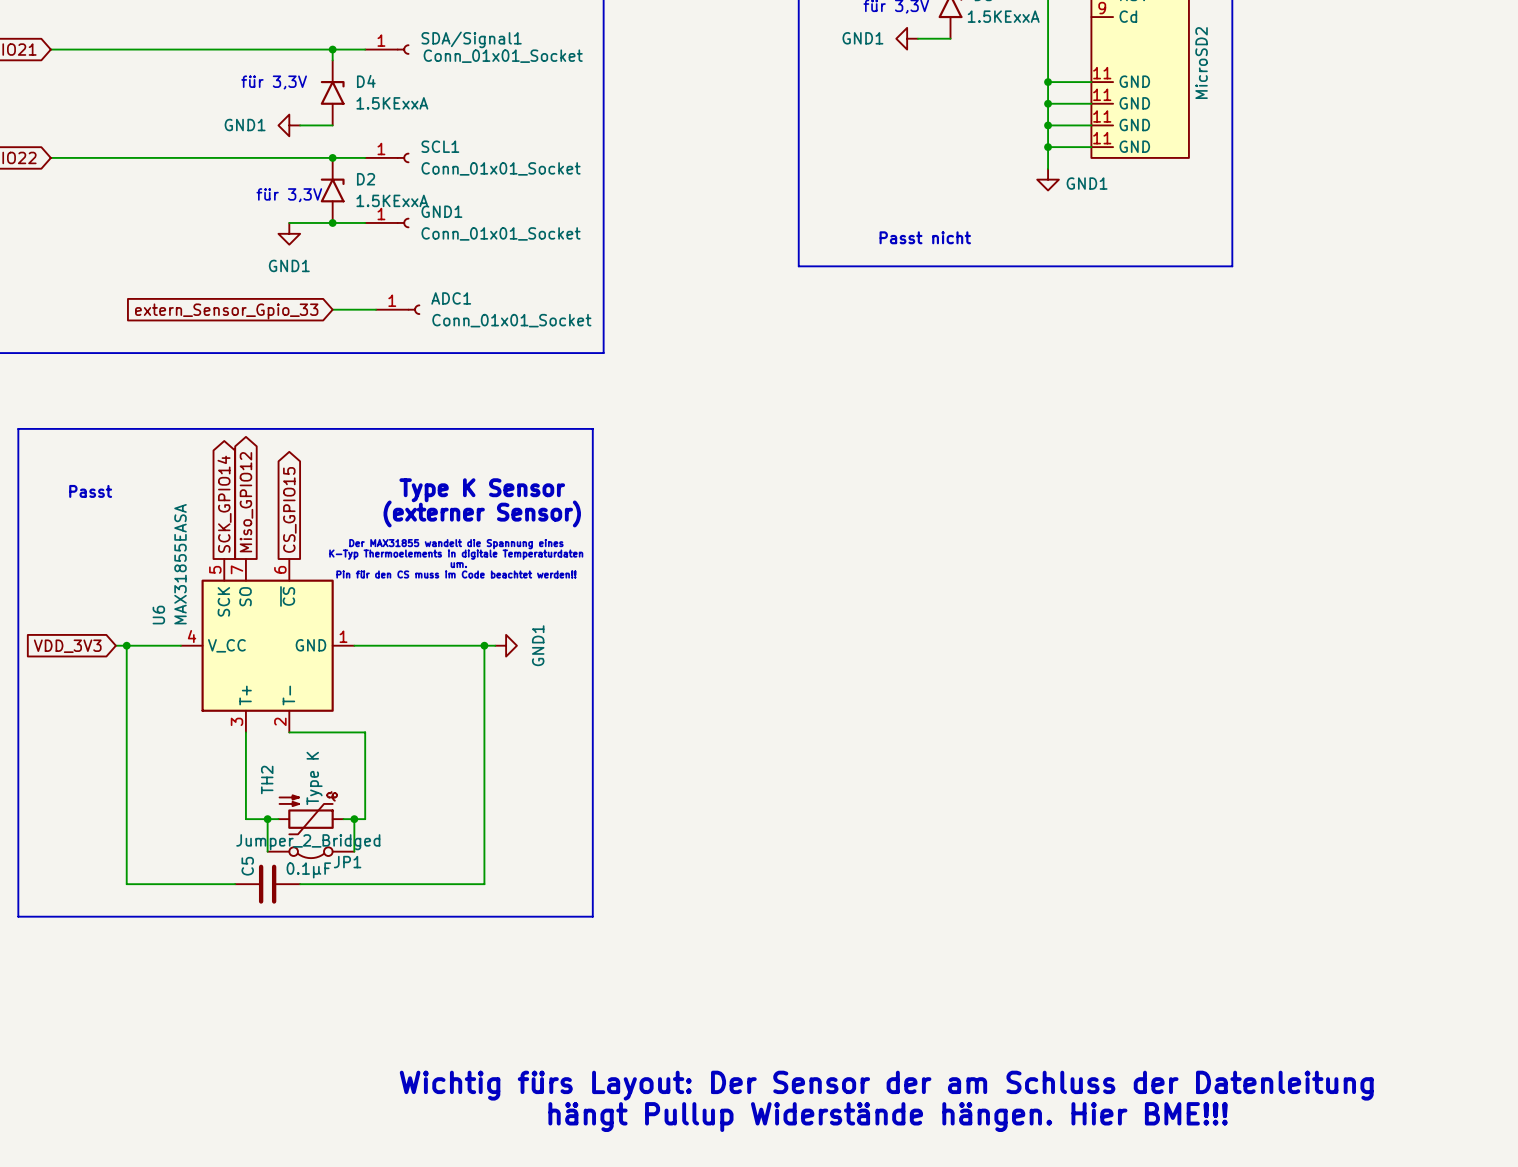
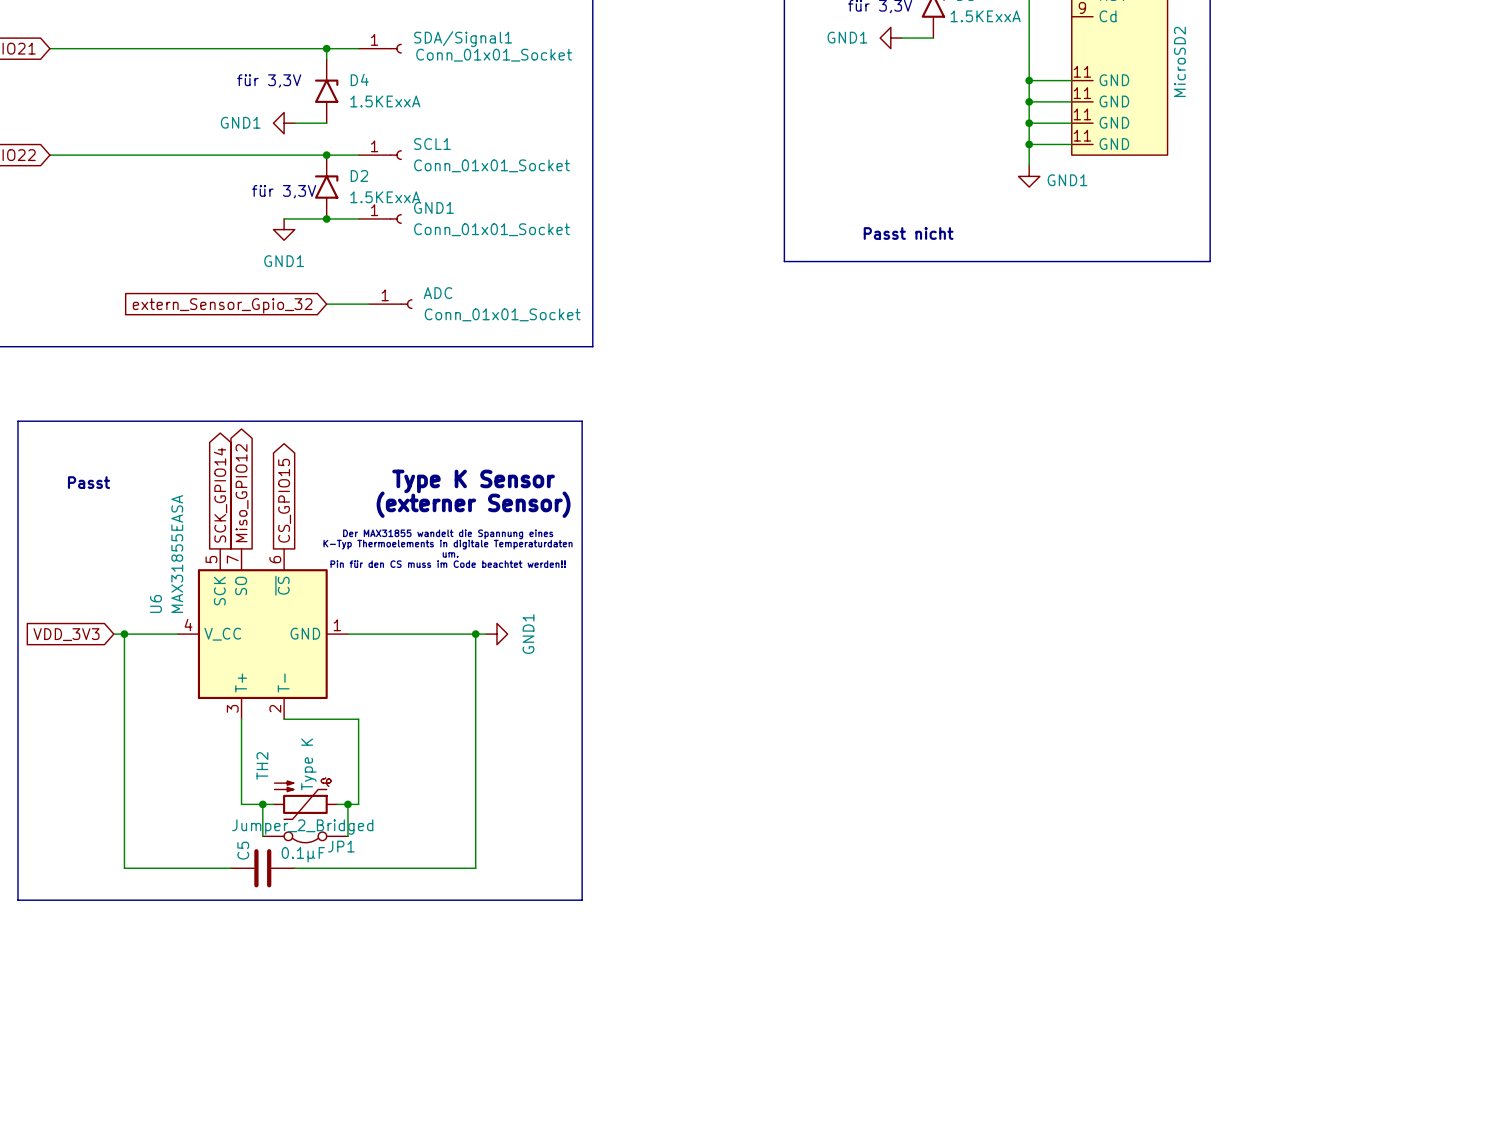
ADC1 name: ADC1 (451, 298) -> ADC (438, 293)
global label: extern_Sensor_Gpio_33 (226, 311) -> extern_Sensor_Gpio_32 (222, 305)
text: Wichtig fürs Layout: Der Sensor der am Schluss der Datenleitung (886, 1085) -> none
text: hängt Pullup Widerstände hängen. Hier BME!!! (888, 1117) -> none

